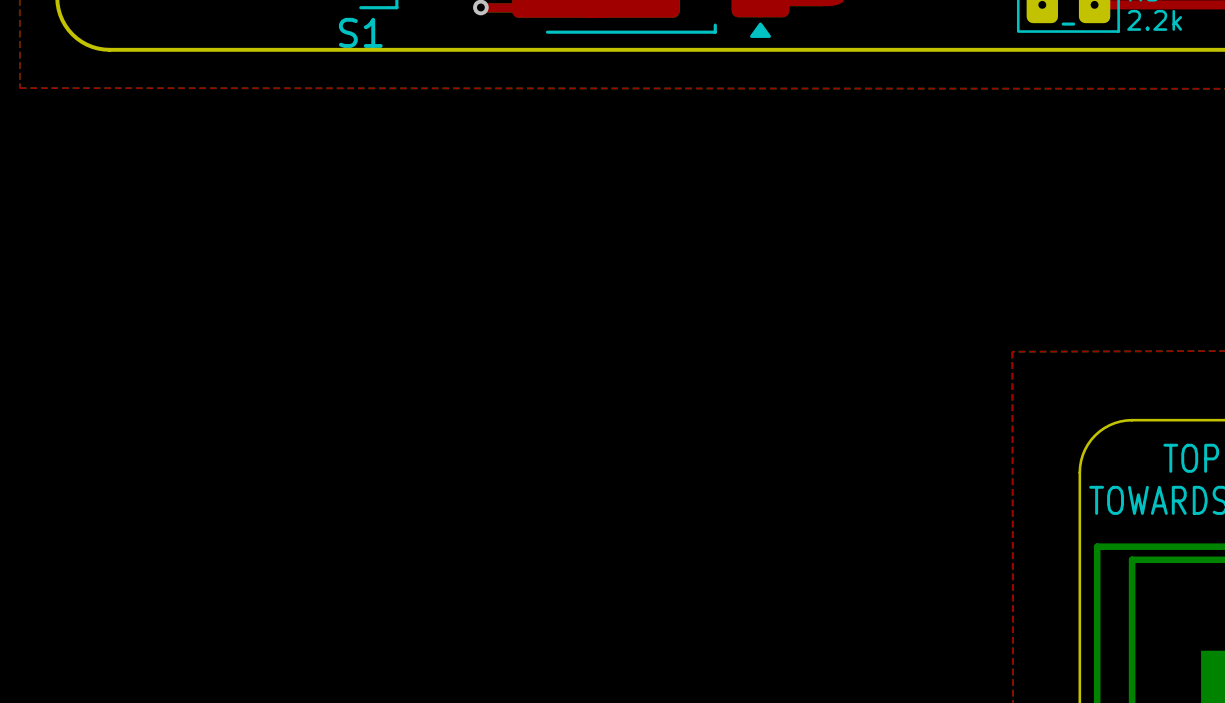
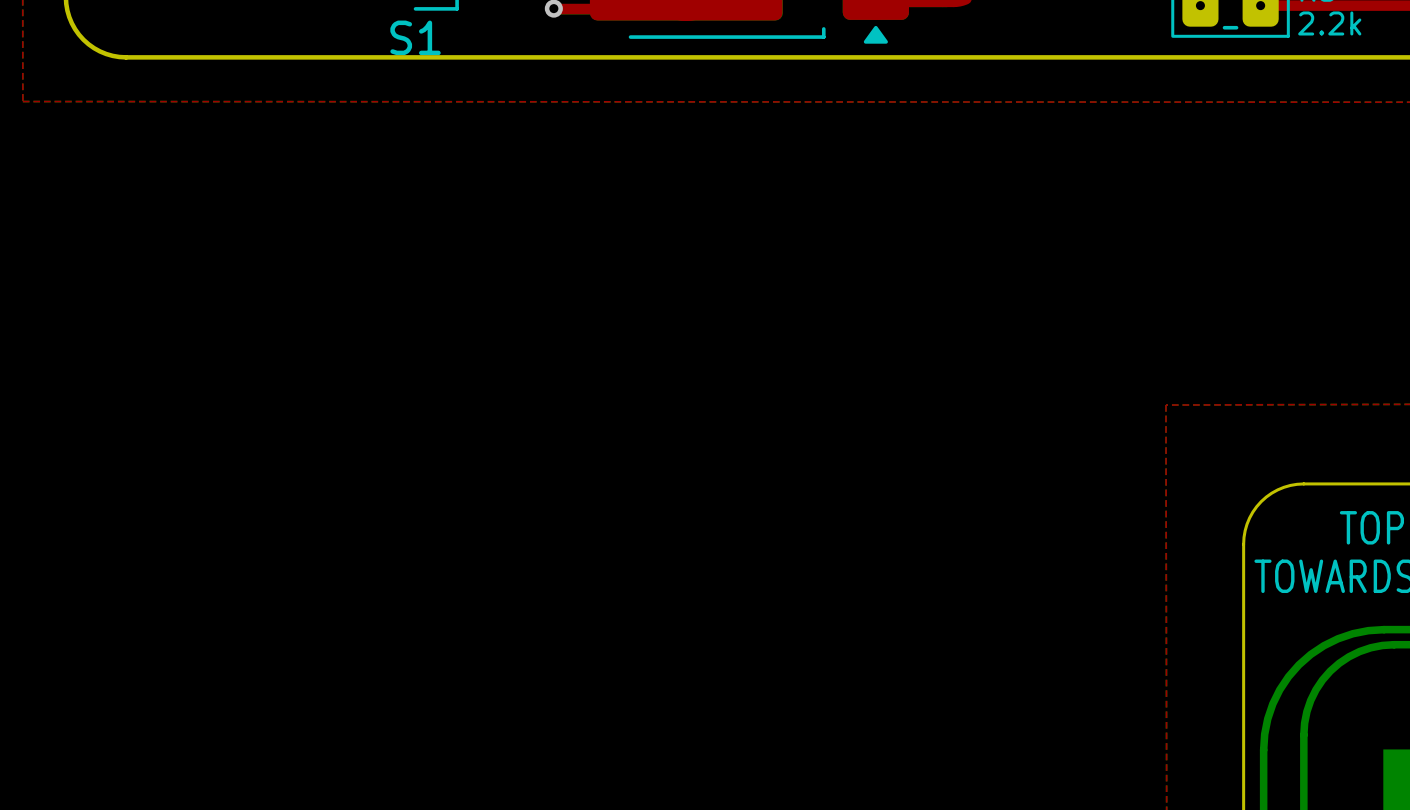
bottom track: (1201, 546) (1097, 546) (1097, 651) -> (1384, 629) (1352, 633) (1337, 638) (1323, 645) (1298, 664) (1288, 676) (1272, 703) (1267, 718) (1263, 750)
bottom track: (1210, 559) (1132, 559) (1132, 638) -> (1394, 644) (1382, 645) (1359, 651) (1348, 656) (1330, 671) (1322, 680) (1310, 700) (1304, 723) (1303, 735)

